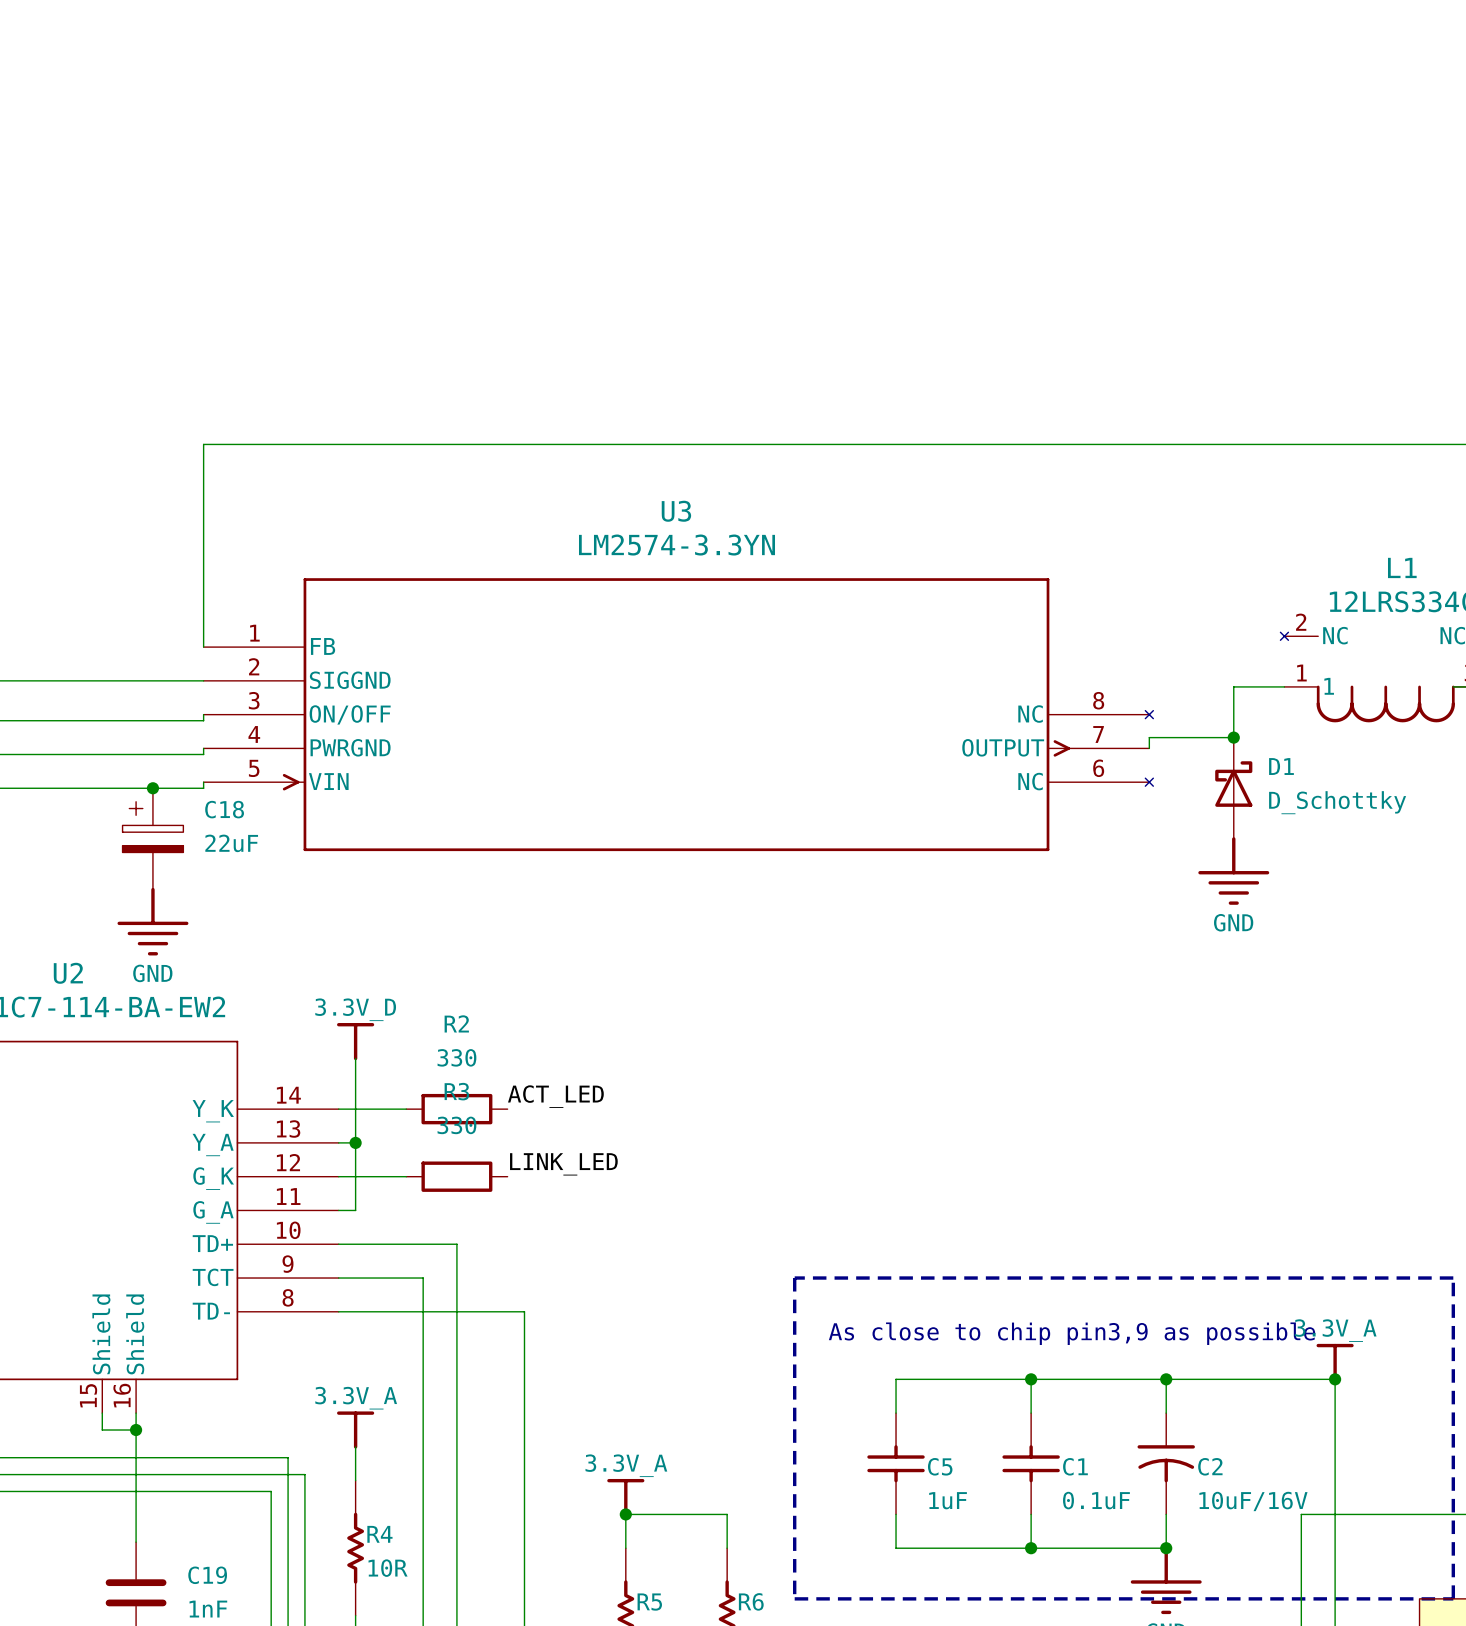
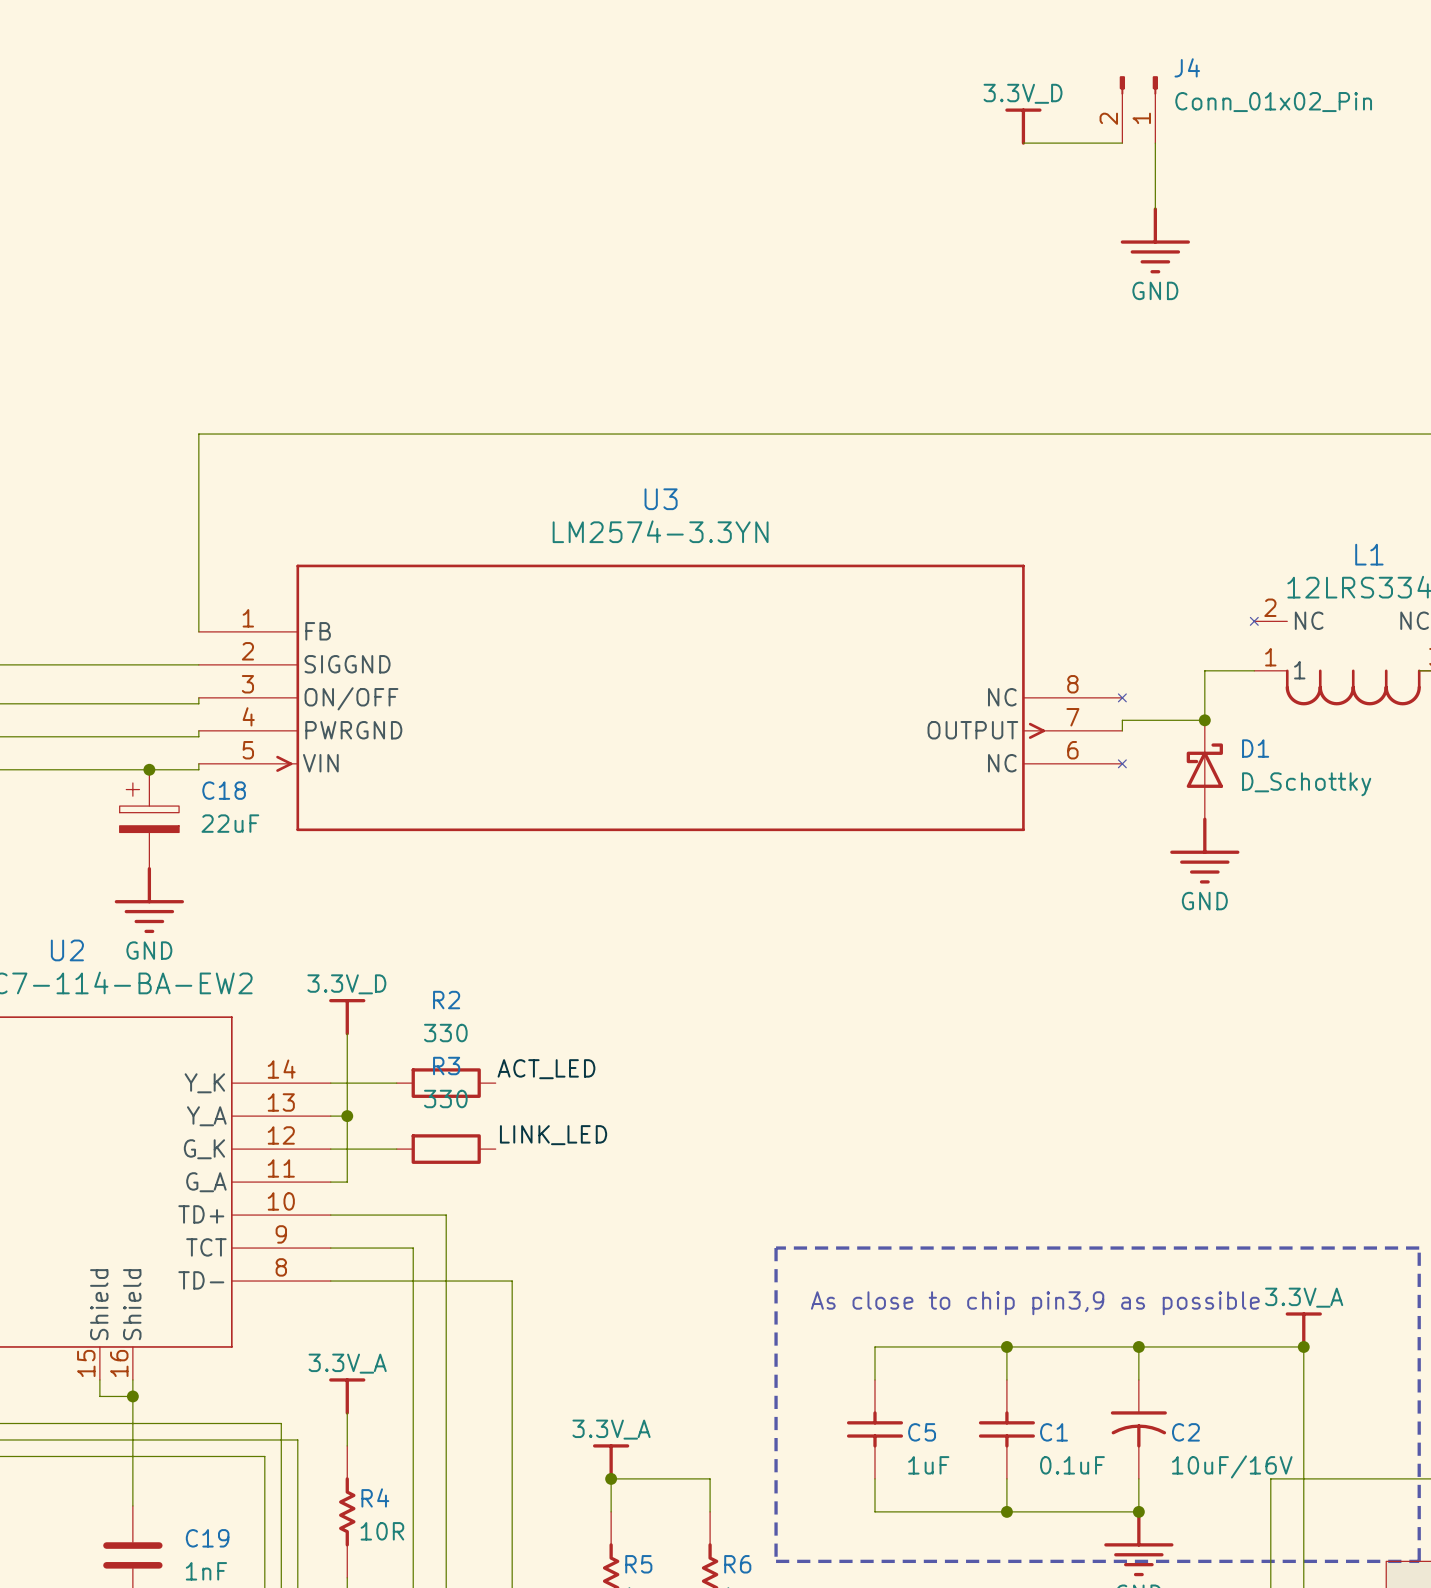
J4: none -> Conn_01x02_Pin (1138, 109)
power symbol: none -> 3.3V_D (1023, 126)
wire: none -> (1023, 143) (1122, 143)
wire: none -> (1155, 143) (1155, 209)
power symbol: none -> GND (1155, 240)

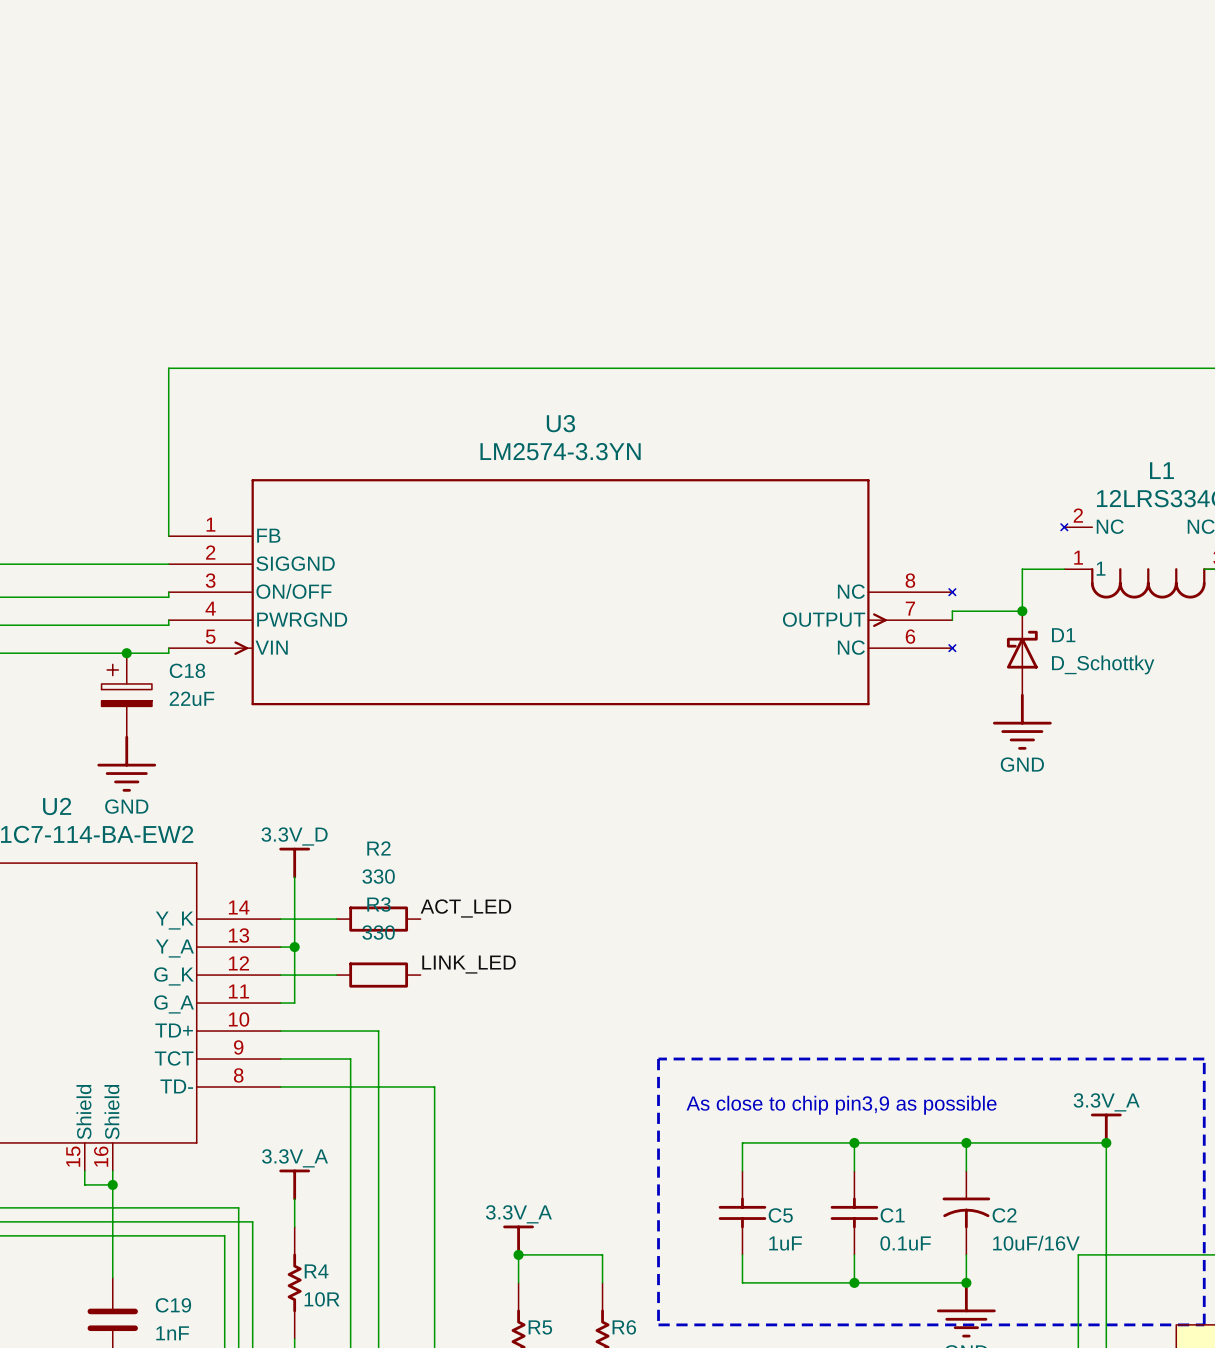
J4: Conn_01x02_Pin (1138, 109) -> none
power symbol: 3.3V_D (1023, 126) -> none
wire: (1023, 143) (1122, 143) -> none
wire: (1155, 143) (1155, 209) -> none
power symbol: GND (1155, 240) -> none

